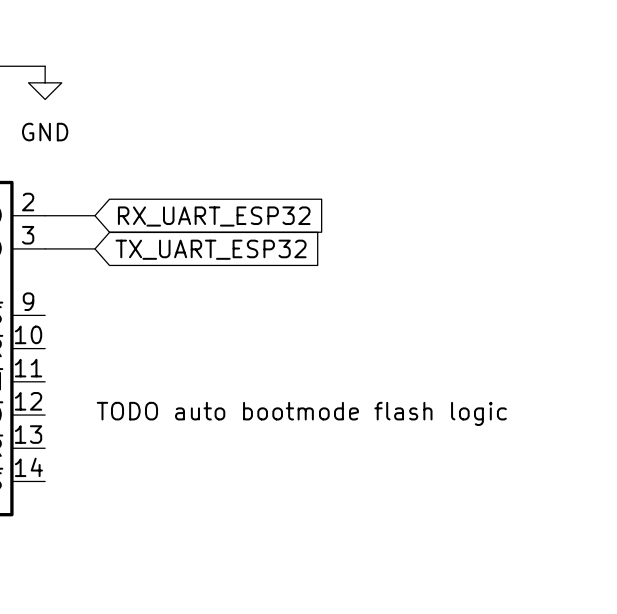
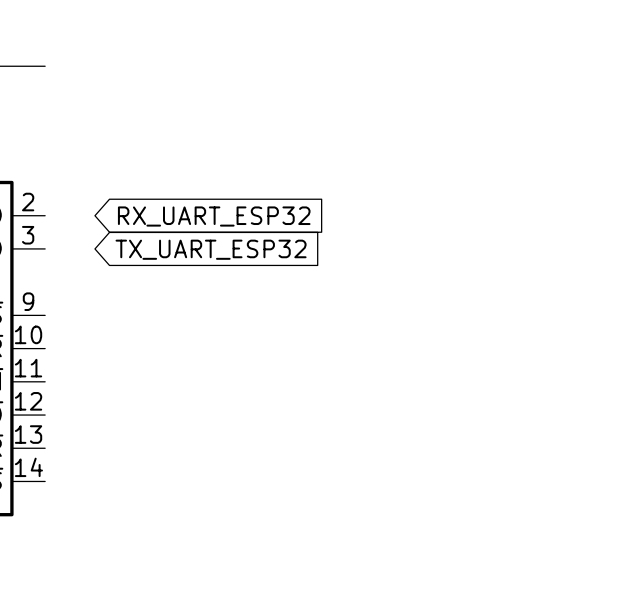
power symbol: GND (45, 82) -> none
wire: (45, 215) (94, 215) -> none
wire: (45, 248) (94, 248) -> none
text: TODO auto bootmode flash logic (301, 413) -> none

